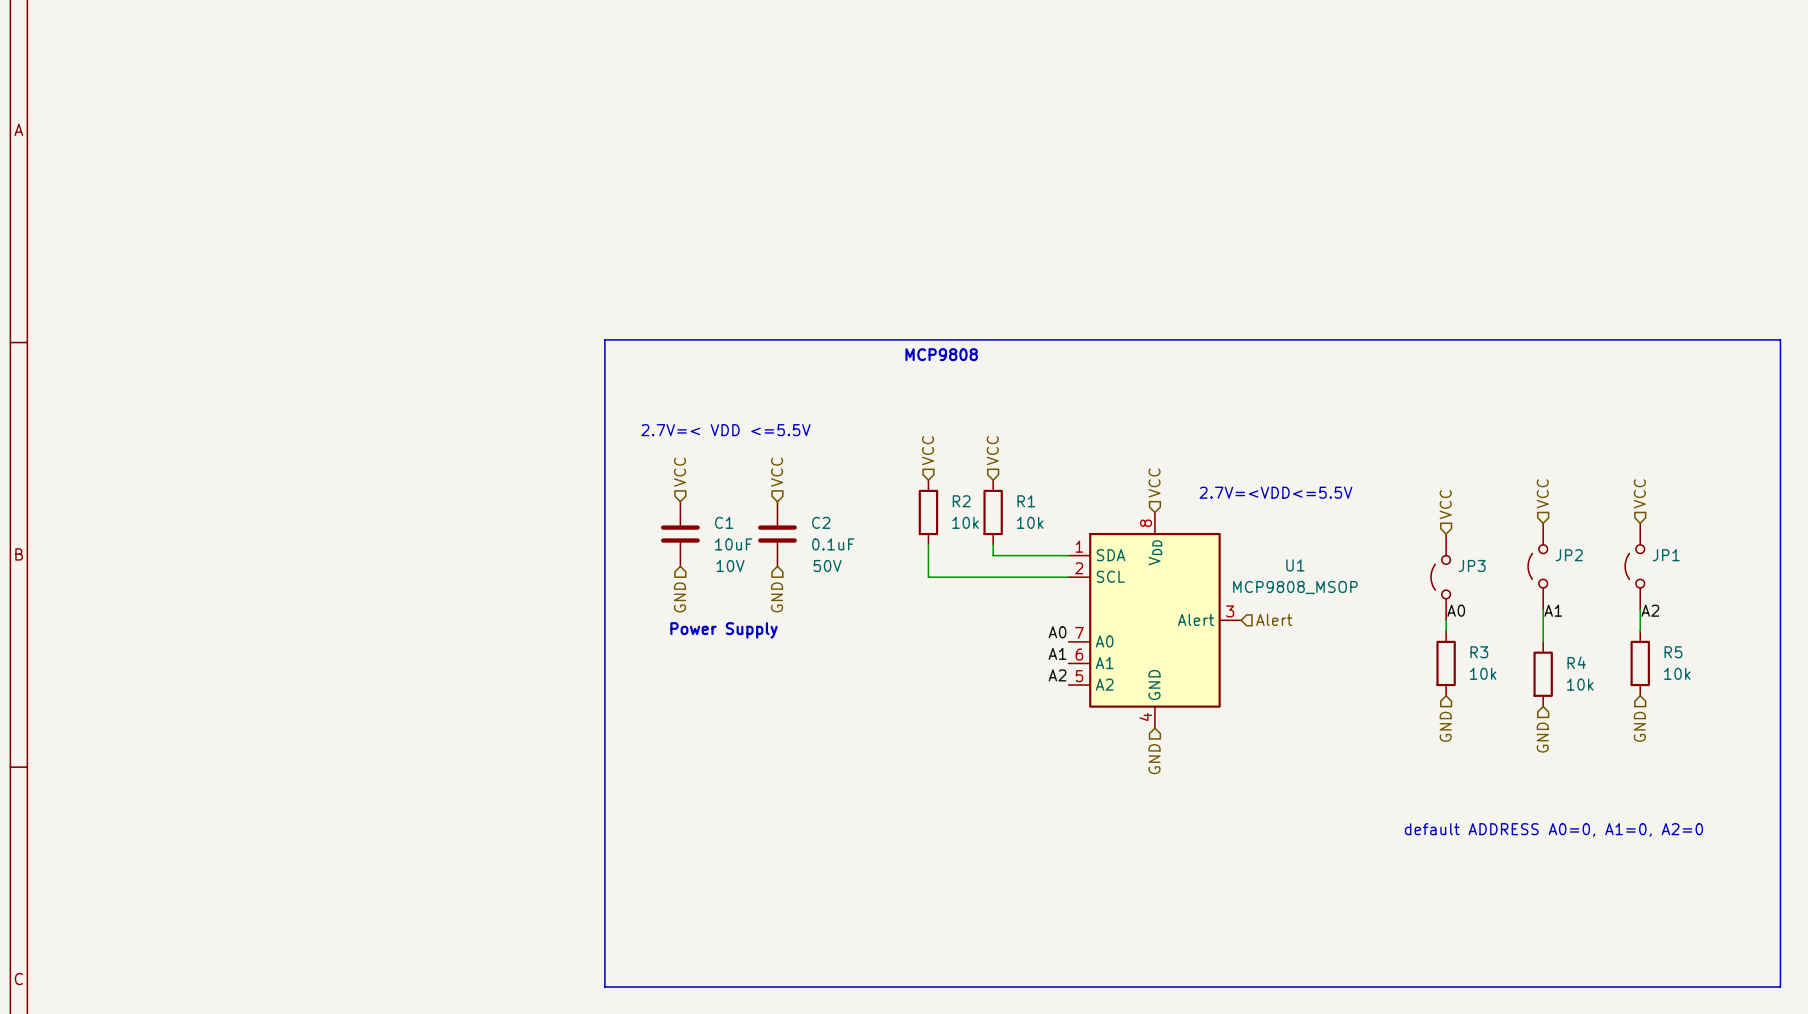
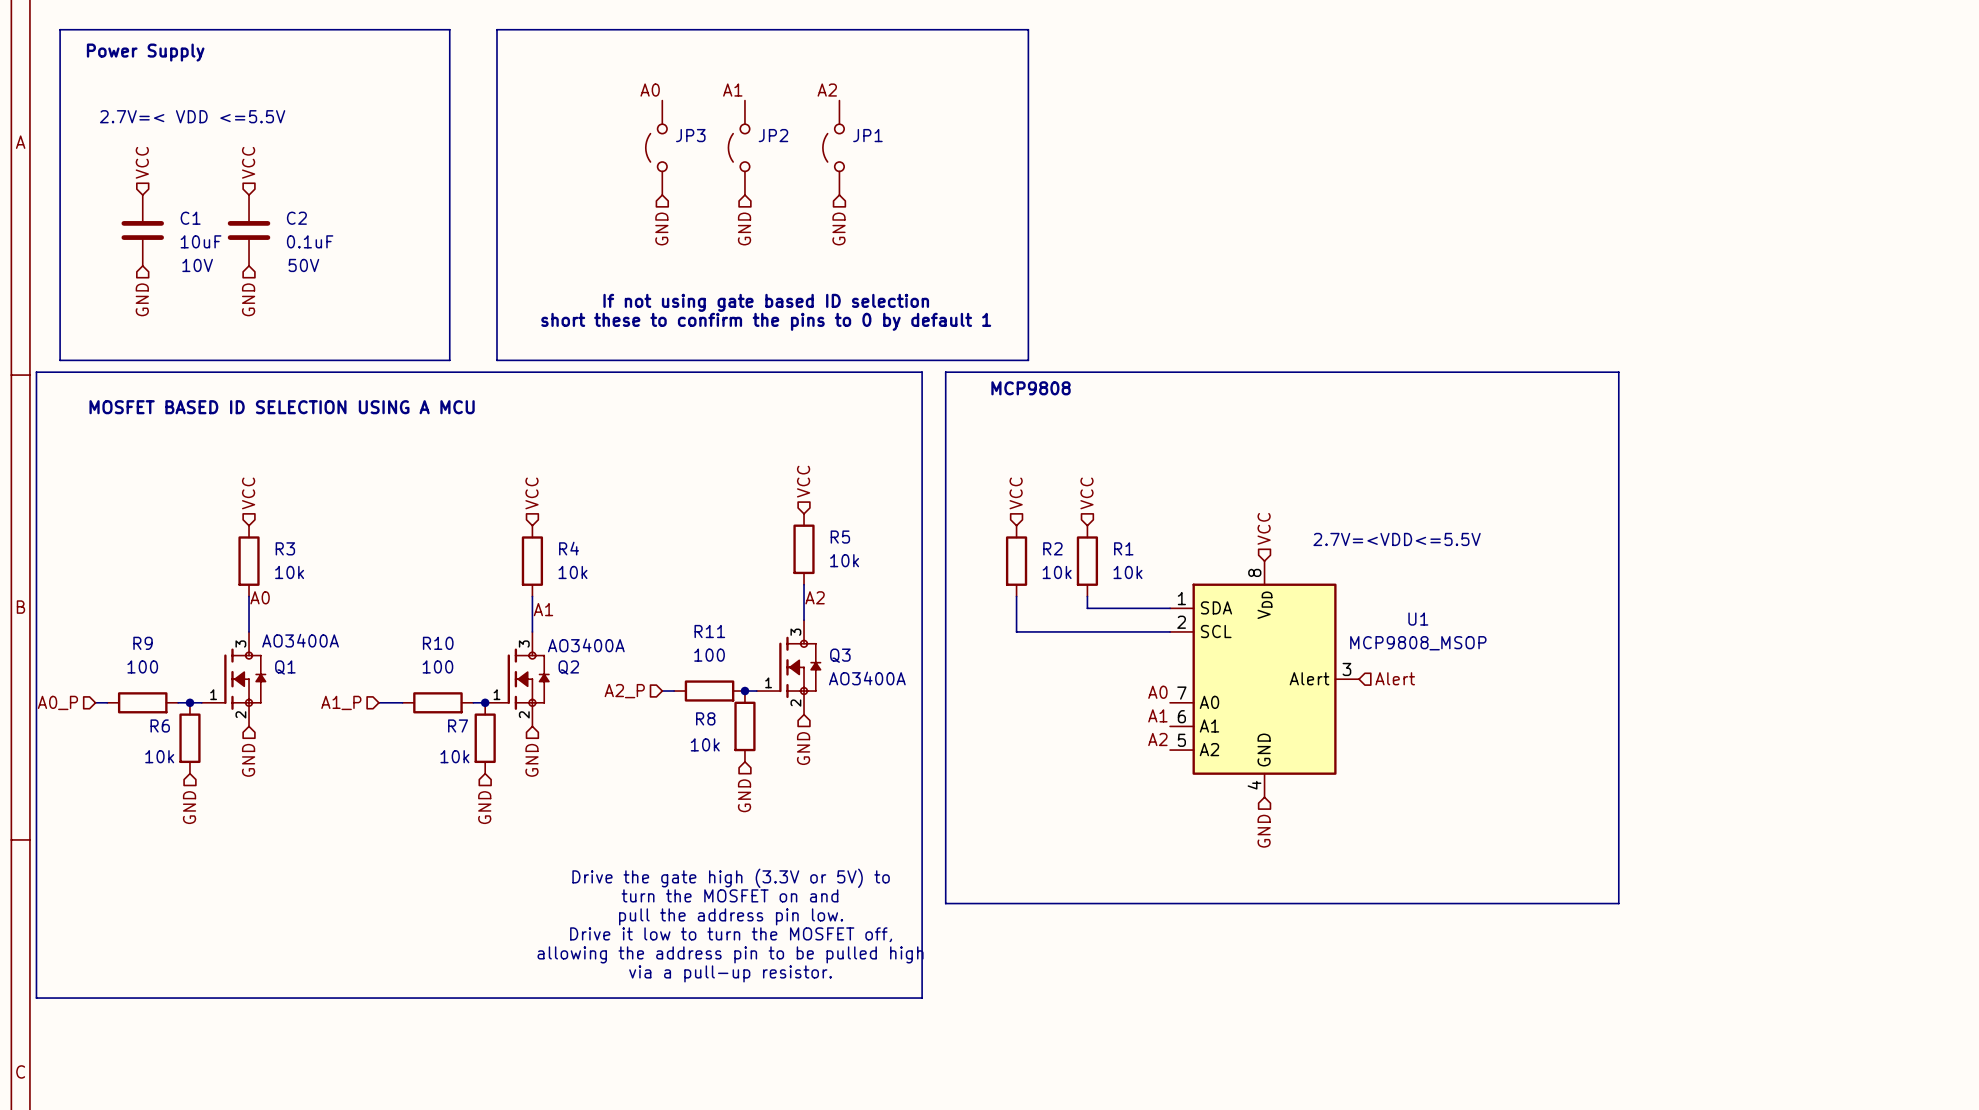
line: none -> (60, 29) (449, 29) (449, 360) (60, 360) (60, 29)
line: none -> (496, 29) (1028, 29) (1028, 360) (496, 360) (496, 29)
text: none -> Power Supply (145, 52)
label: none -> A0 (650, 90)
label: none -> A1 (732, 90)
label: none -> A2 (827, 90)
text: none -> 2.7V=< VDD <=5.5V (192, 116)
hierarchical label: none -> VCC (142, 162)
hierarchical label: none -> VCC (248, 162)
hierarchical label: none -> GND (661, 228)
hierarchical label: none -> GND (744, 228)
hierarchical label: none -> GND (838, 228)
hierarchical label: none -> GND (142, 299)
hierarchical label: none -> GND (248, 299)
text: none -> If not using gate based ID selection (766, 302)
text: none -> short these to confirm the pins to 0 by default 1 (766, 321)
line: (604, 339) (604, 987) (1780, 987) (1780, 339) (1478, 339) -> (945, 372) (945, 903) (1618, 903) (1618, 372)
line: (842, 339) (863, 339) -> (922, 372) (922, 998) (36, 998) (36, 372) (662, 372)
text: none -> MOSFET BASED ID SELECTION USING A MCU (282, 407)
text: 2.7V=< VDD <=5.5V (725, 430) -> none
hierarchical label: none -> VCC (803, 481)
hierarchical label: none -> VCC (248, 493)
hierarchical label: none -> VCC (531, 493)
hierarchical label: VCC (679, 472) -> none
hierarchical label: VCC (777, 472) -> none
hierarchical label: VCC (1542, 493) -> none
hierarchical label: VCC (1639, 493) -> none
hierarchical label: VCC (1445, 504) -> none
C1 position: (680, 534) -> (142, 230)
wire: none -> (804, 584) (804, 620)
C2 position: (777, 534) -> (249, 230)
wire: none -> (249, 596) (249, 631)
wire: none -> (532, 596) (532, 631)
label: none -> A0 (260, 597)
label: none -> A2 (815, 597)
label: none -> A1 (543, 609)
JP2 position: (1537, 566) -> (739, 147)
JP1 position: (1634, 566) -> (833, 147)
JP3 position: (1440, 577) -> (656, 147)
hierarchical label: GND (679, 597) -> none
hierarchical label: GND (777, 597) -> none
Q3: none -> AO3400A (789, 667)
wire: (1543, 609) (1543, 641) -> none
wire: (1640, 609) (1640, 631) -> none
label: A0 (1456, 610) -> none
label: A1 (1553, 610) -> none
label: A2 (1650, 610) -> none
Q1: none -> AO3400A (234, 679)
Q2: none -> AO3400A (517, 679)
wire: (1446, 620) (1446, 631) -> none
text: Power Supply (724, 630) -> none
hierarchical label: none -> A2_P (624, 691)
wire: none -> (662, 691) (674, 691)
R11: none -> 100 (709, 691)
wire: none -> (744, 691) (756, 691)
junction: none -> (744, 691)
wire: none -> (95, 702) (107, 702)
R9: none -> 100 (142, 702)
wire: none -> (178, 702) (201, 702)
junction: none -> (189, 702)
wire: none -> (378, 702) (402, 702)
R10: none -> 100 (437, 702)
wire: none -> (473, 702) (485, 702)
junction: none -> (485, 702)
hierarchical label: none -> A0_P (57, 702)
hierarchical label: none -> A1_P (341, 702)
R8: none -> 10k (744, 726)
R3 position: (1446, 663) -> (249, 561)
R5 position: (1640, 663) -> (804, 549)
R6: none -> 10k (189, 738)
R7: none -> 10k (485, 738)
R4 position: (1543, 674) -> (532, 561)
hierarchical label: none -> GND (803, 748)
hierarchical label: none -> GND (248, 760)
hierarchical label: none -> GND (531, 760)
hierarchical label: none -> GND (744, 795)
hierarchical label: GND (1445, 726) -> none
hierarchical label: GND (1639, 726) -> none
hierarchical label: none -> GND (189, 807)
hierarchical label: none -> GND (484, 807)
hierarchical label: GND (1542, 737) -> none
text: none -> Drive the gate high (3.3V or 5V) to (731, 878)
text: none -> turn the MOSFET on and (729, 895)
text: default ADDRESS A0=0, A1=0, A2=0 (1553, 829) -> none
text: none -> pull the address pin low. (731, 916)
text: none -> Drive it low to turn the MOSFET off, (731, 934)
text: none -> allowing the address pin to be pulled high (730, 954)
text: none -> via a pull-up resistor. (730, 973)

